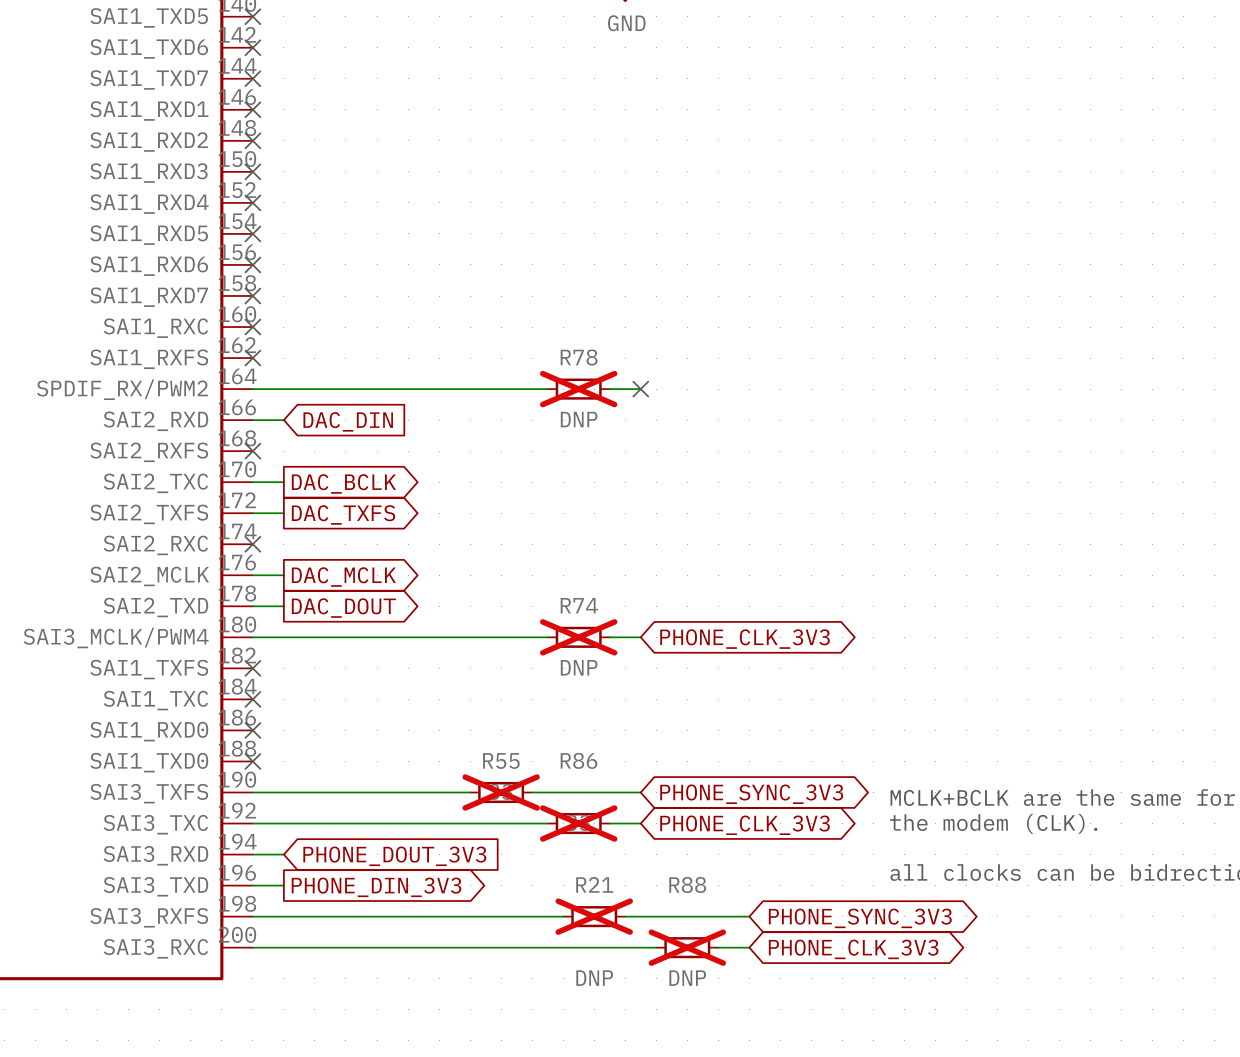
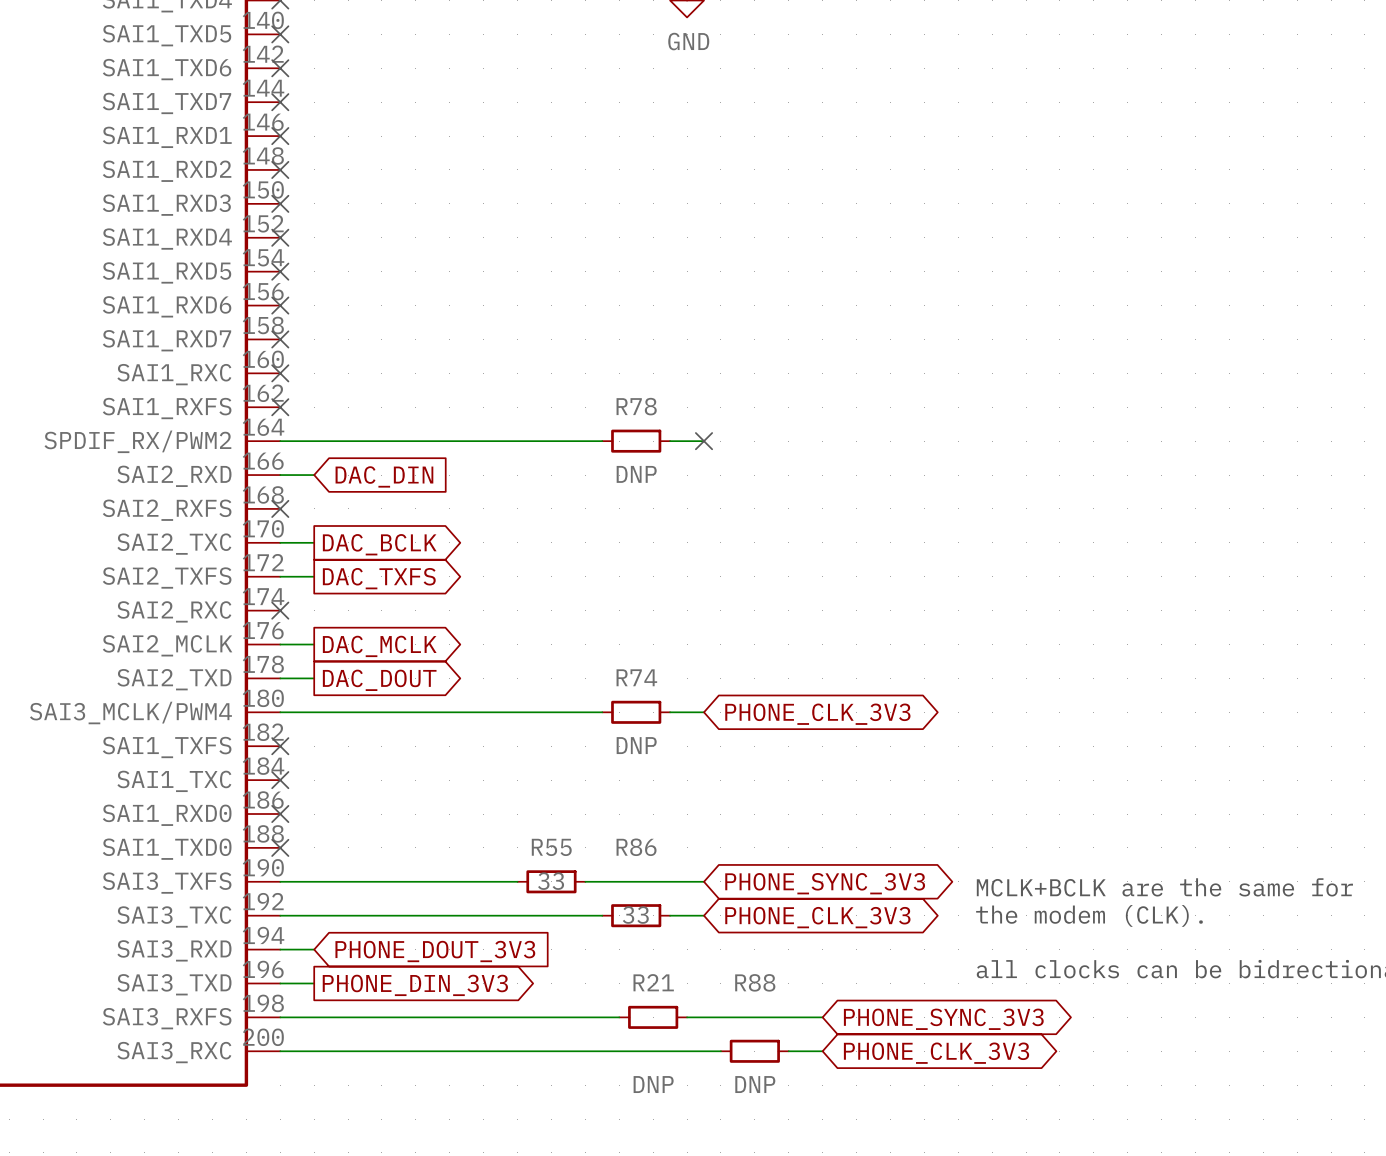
R78 do-not-place cross: (578, 389) -> none
R74 do-not-place cross: (578, 637) -> none
R55 do-not-place cross: (501, 792) -> none
R86 do-not-place cross: (578, 823) -> none
R21 do-not-place cross: (594, 916) -> none
R88 do-not-place cross: (687, 947) -> none

